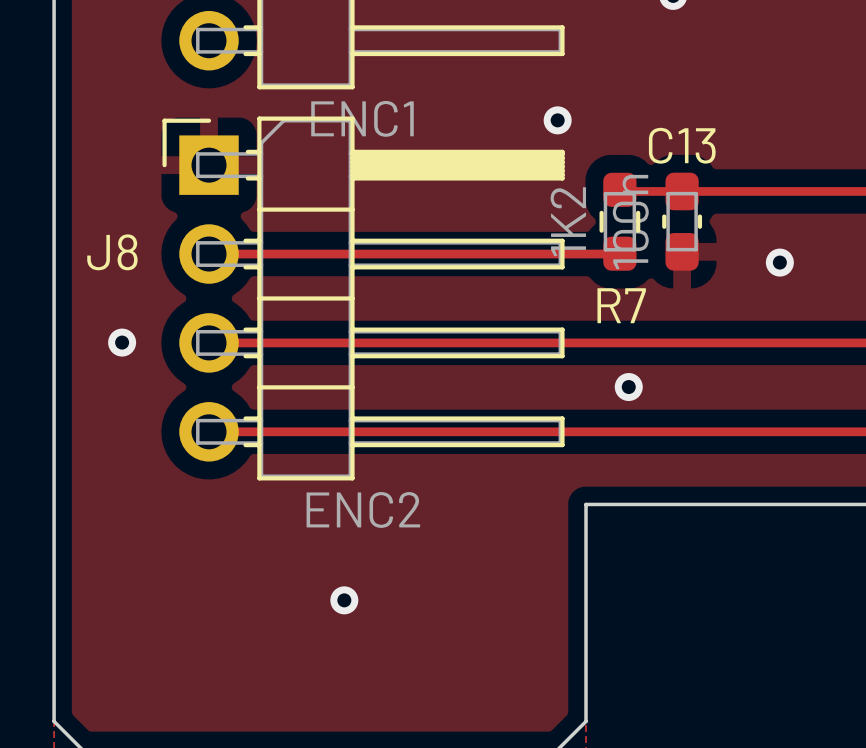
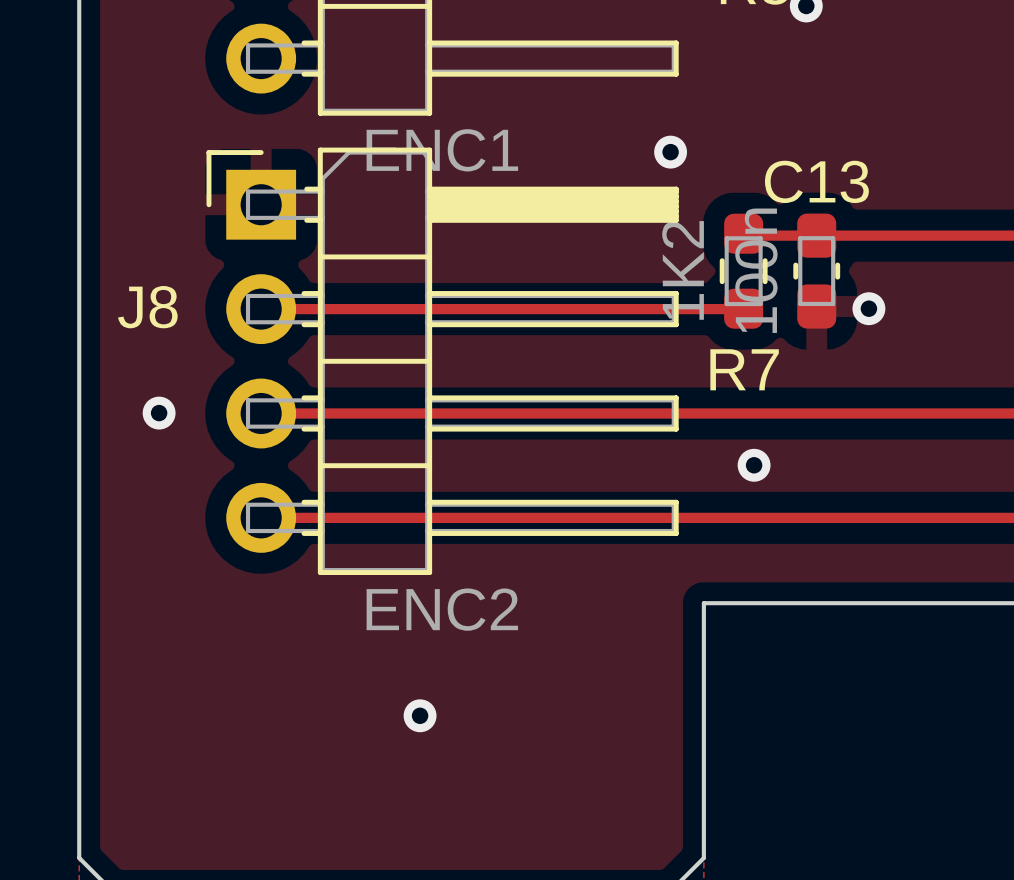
via position: (779, 262) -> (868, 308)

